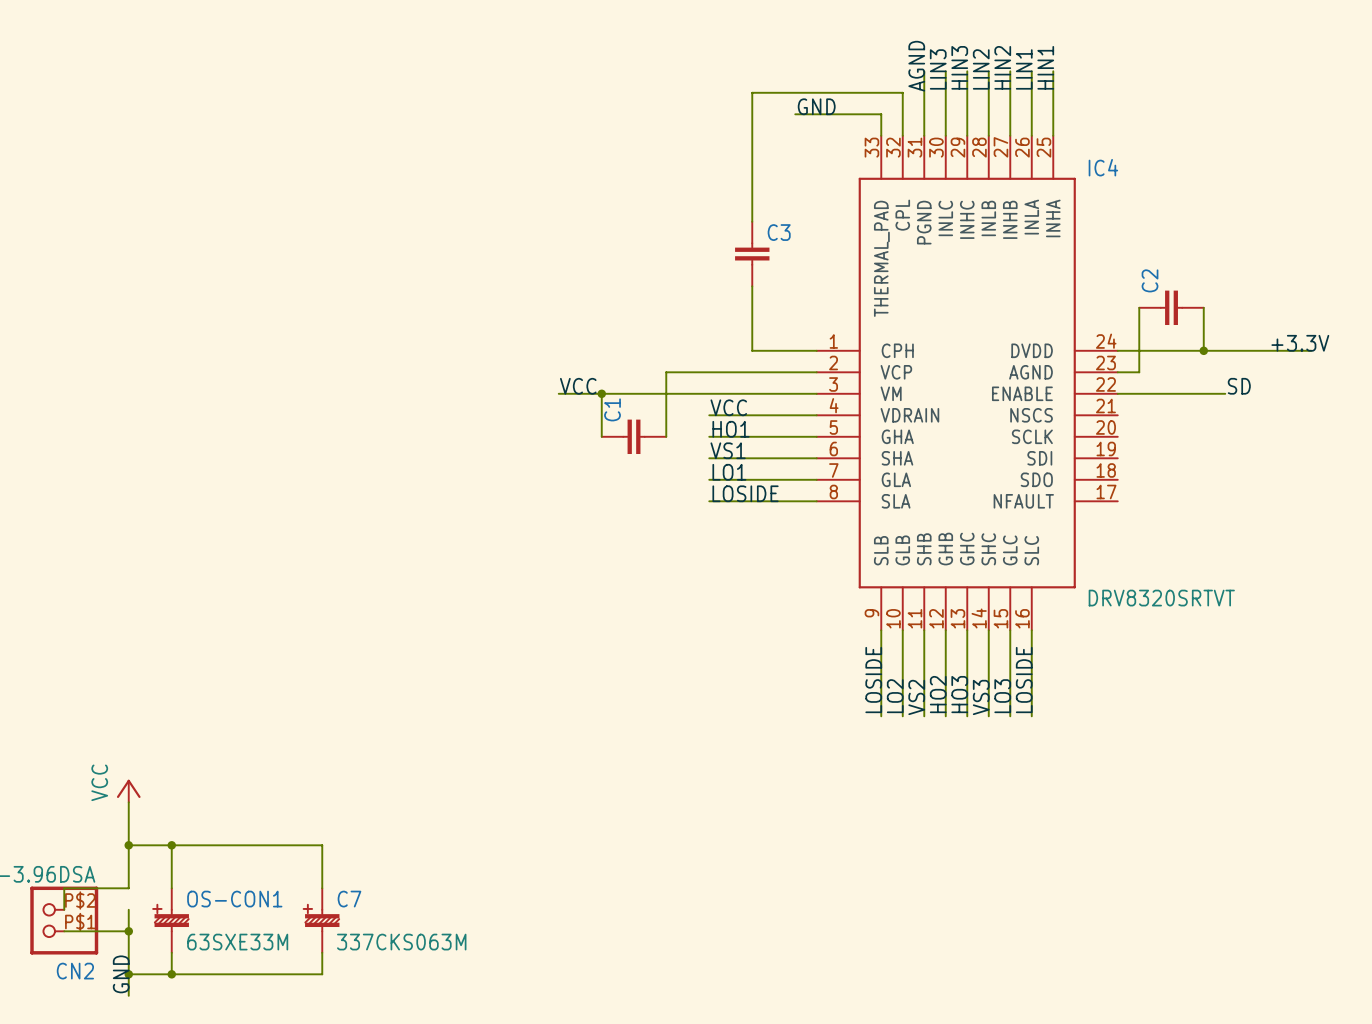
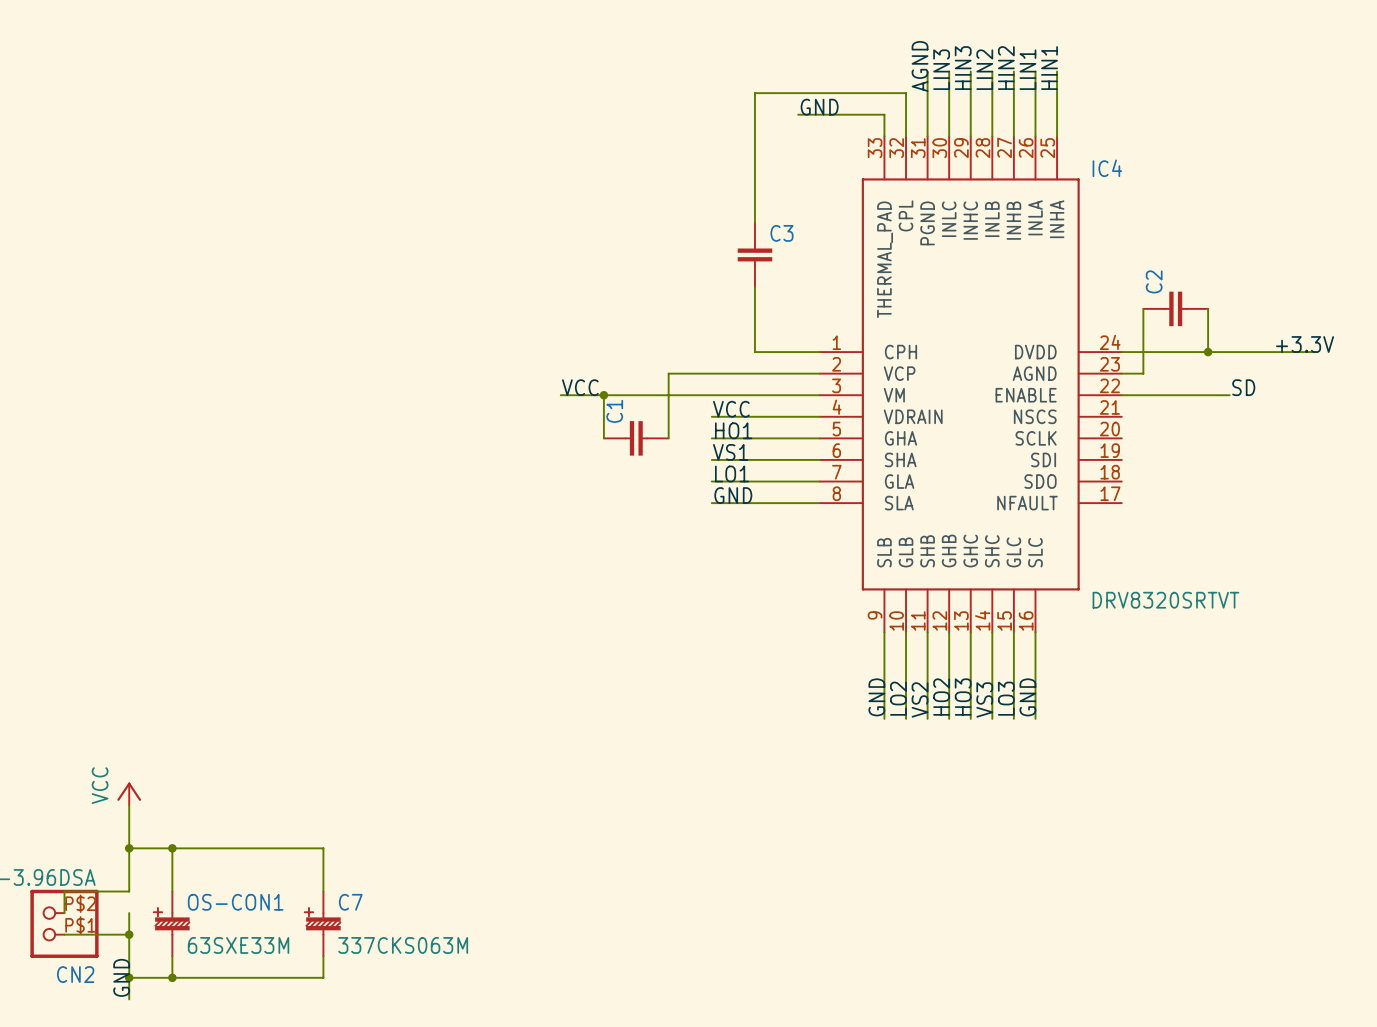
label: LOSIDE (745, 493) -> GND (733, 495)
label: LOSIDE (873, 680) -> GND (876, 697)
label: LOSIDE (1024, 680) -> GND (1027, 697)

